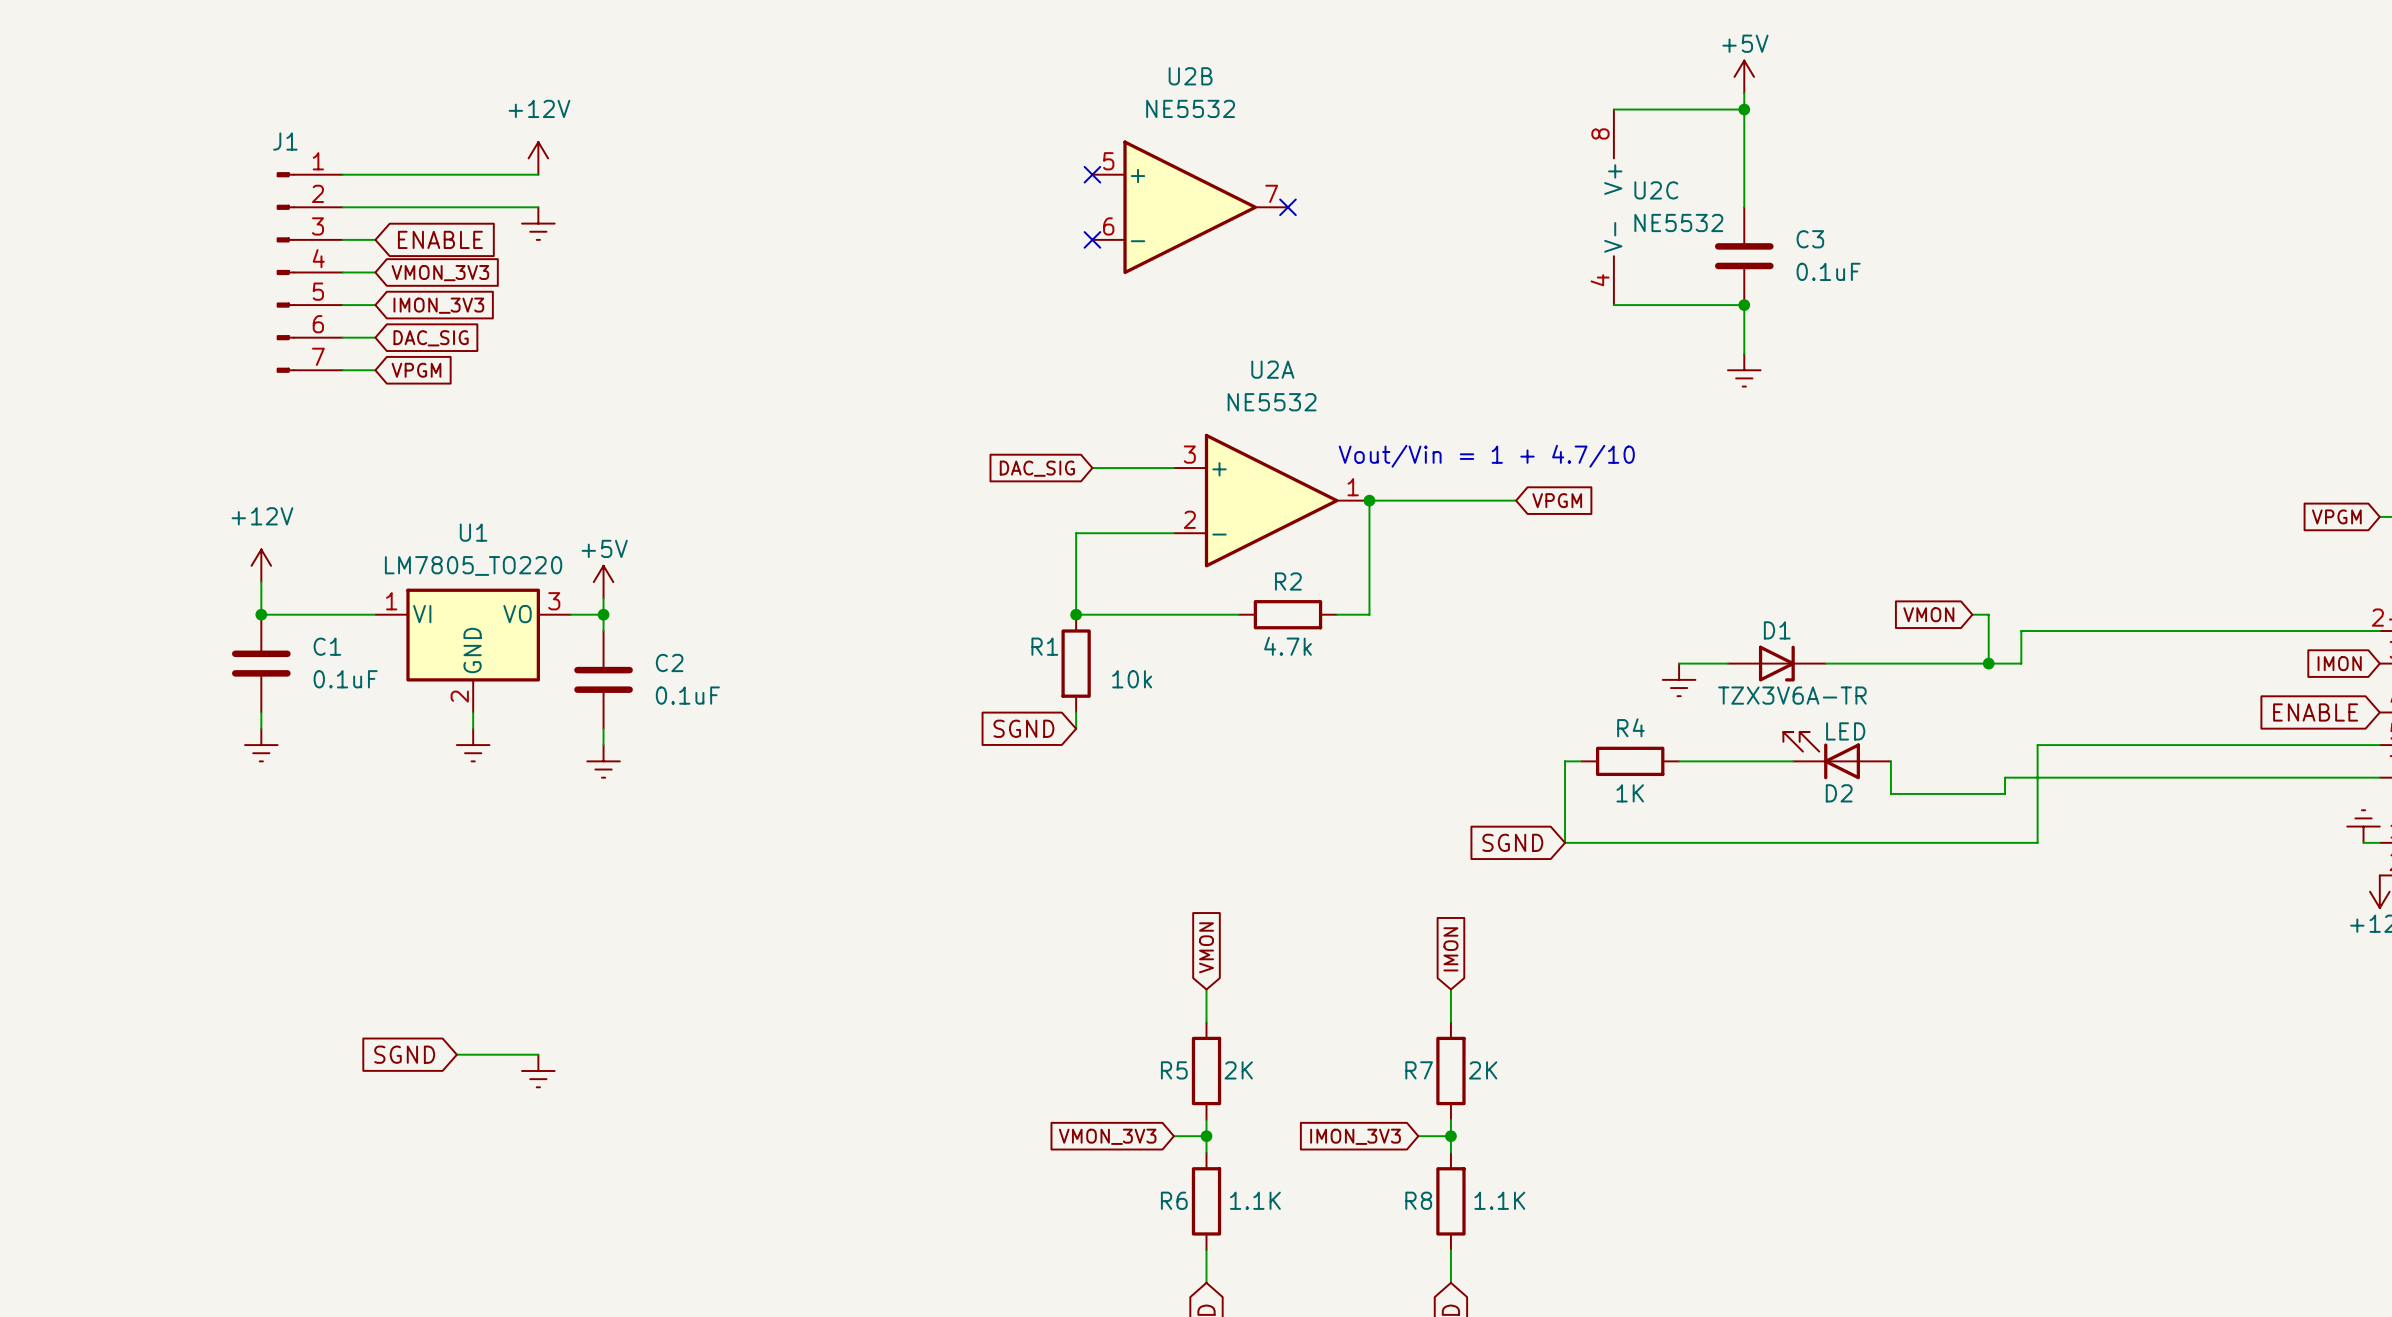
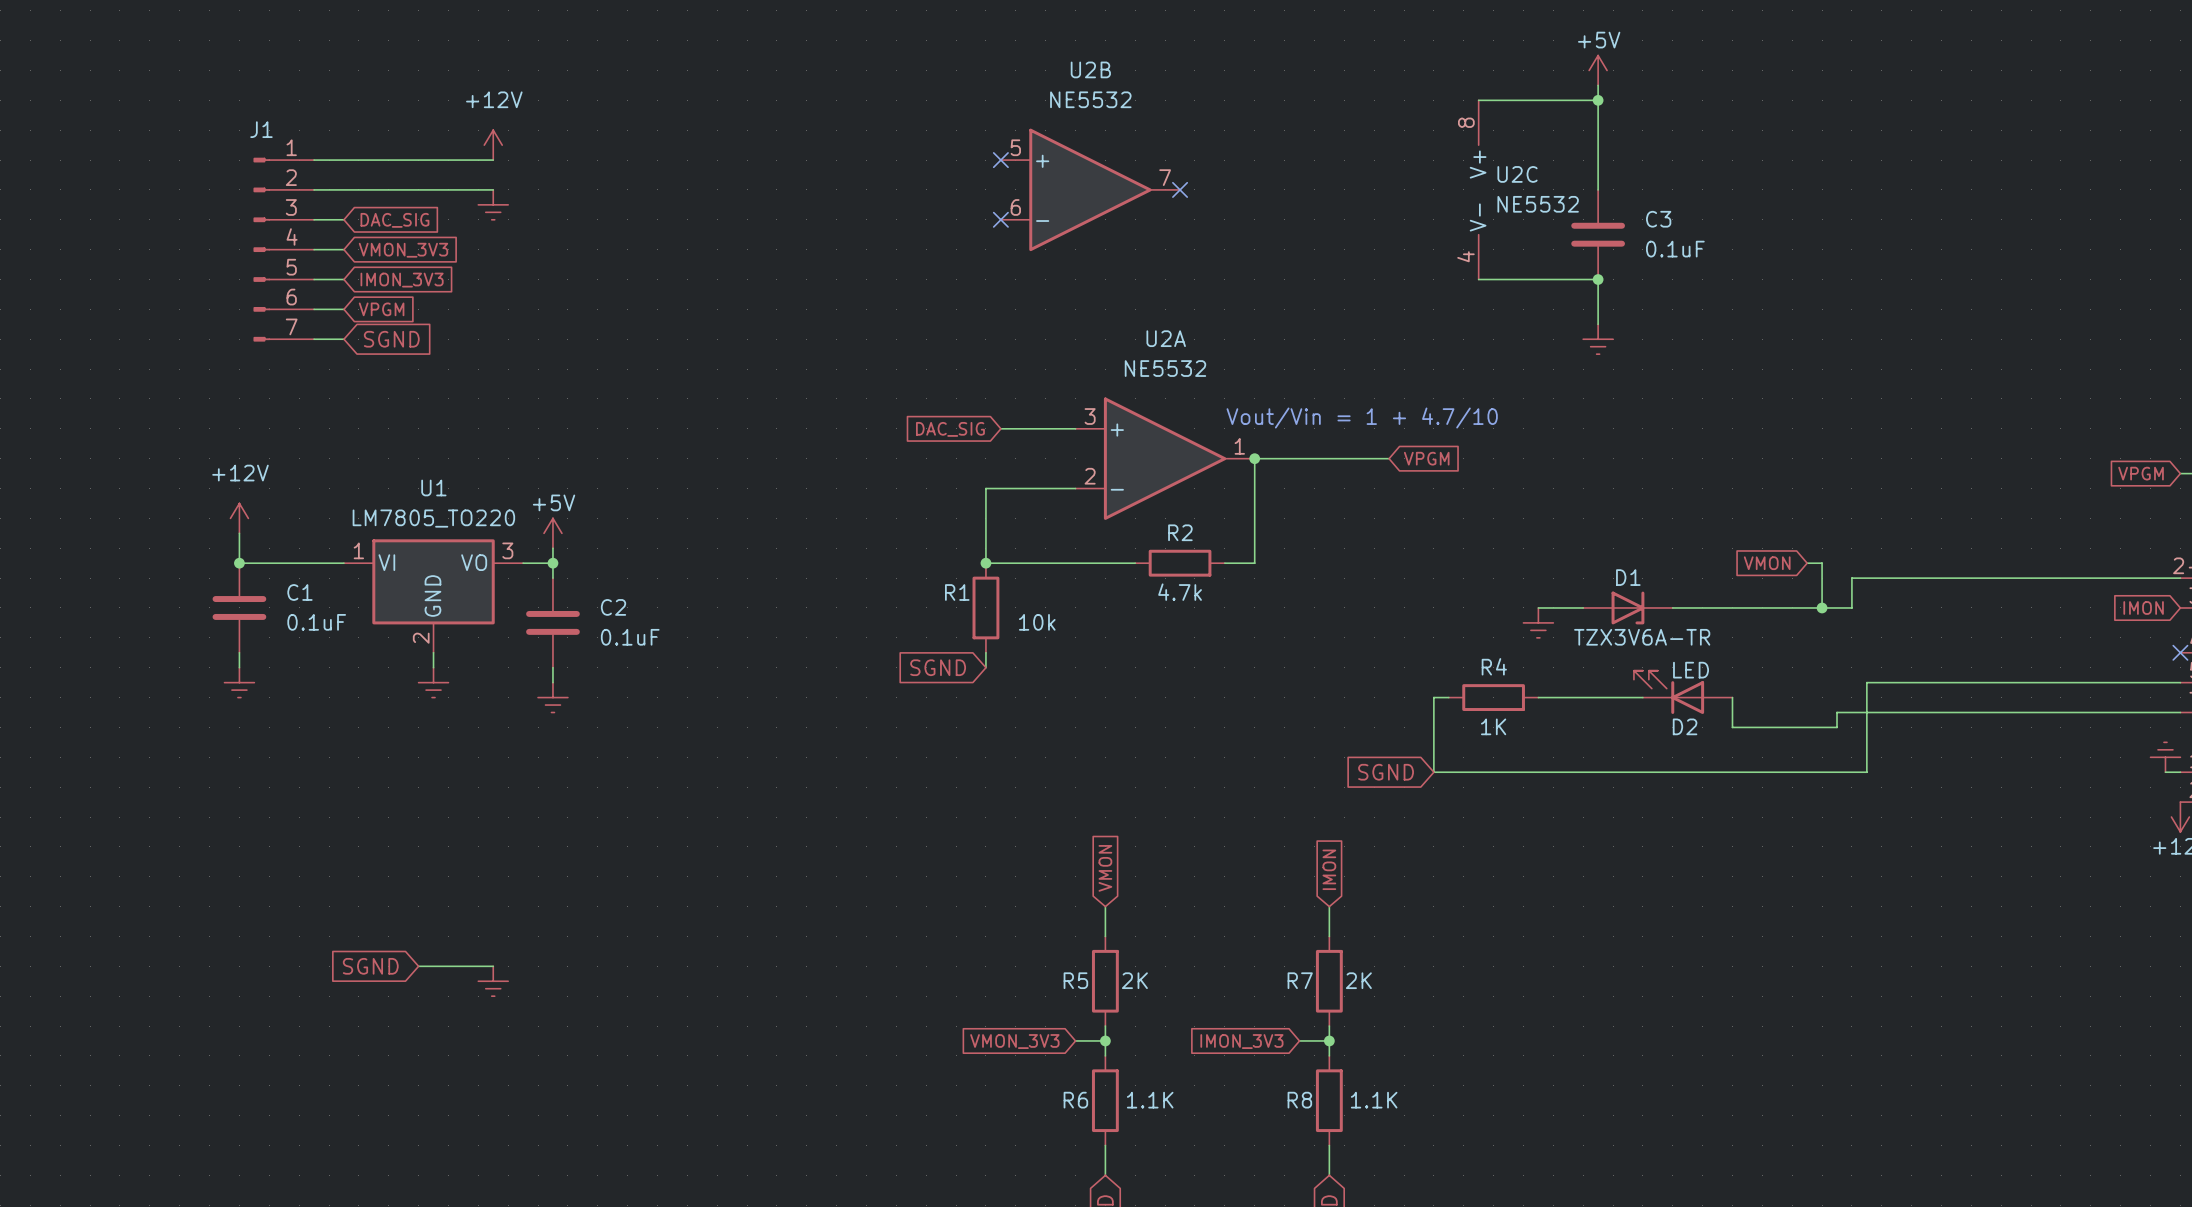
global label: ENABLE (440, 239) -> DAC_SIG (394, 220)
global label: DAC_SIG (431, 338) -> VPGM (381, 309)
global label: VPGM (416, 370) -> SGND (391, 339)
global label: ENABLE (2315, 712) -> none
no-connect mark: none -> (2180, 652)

